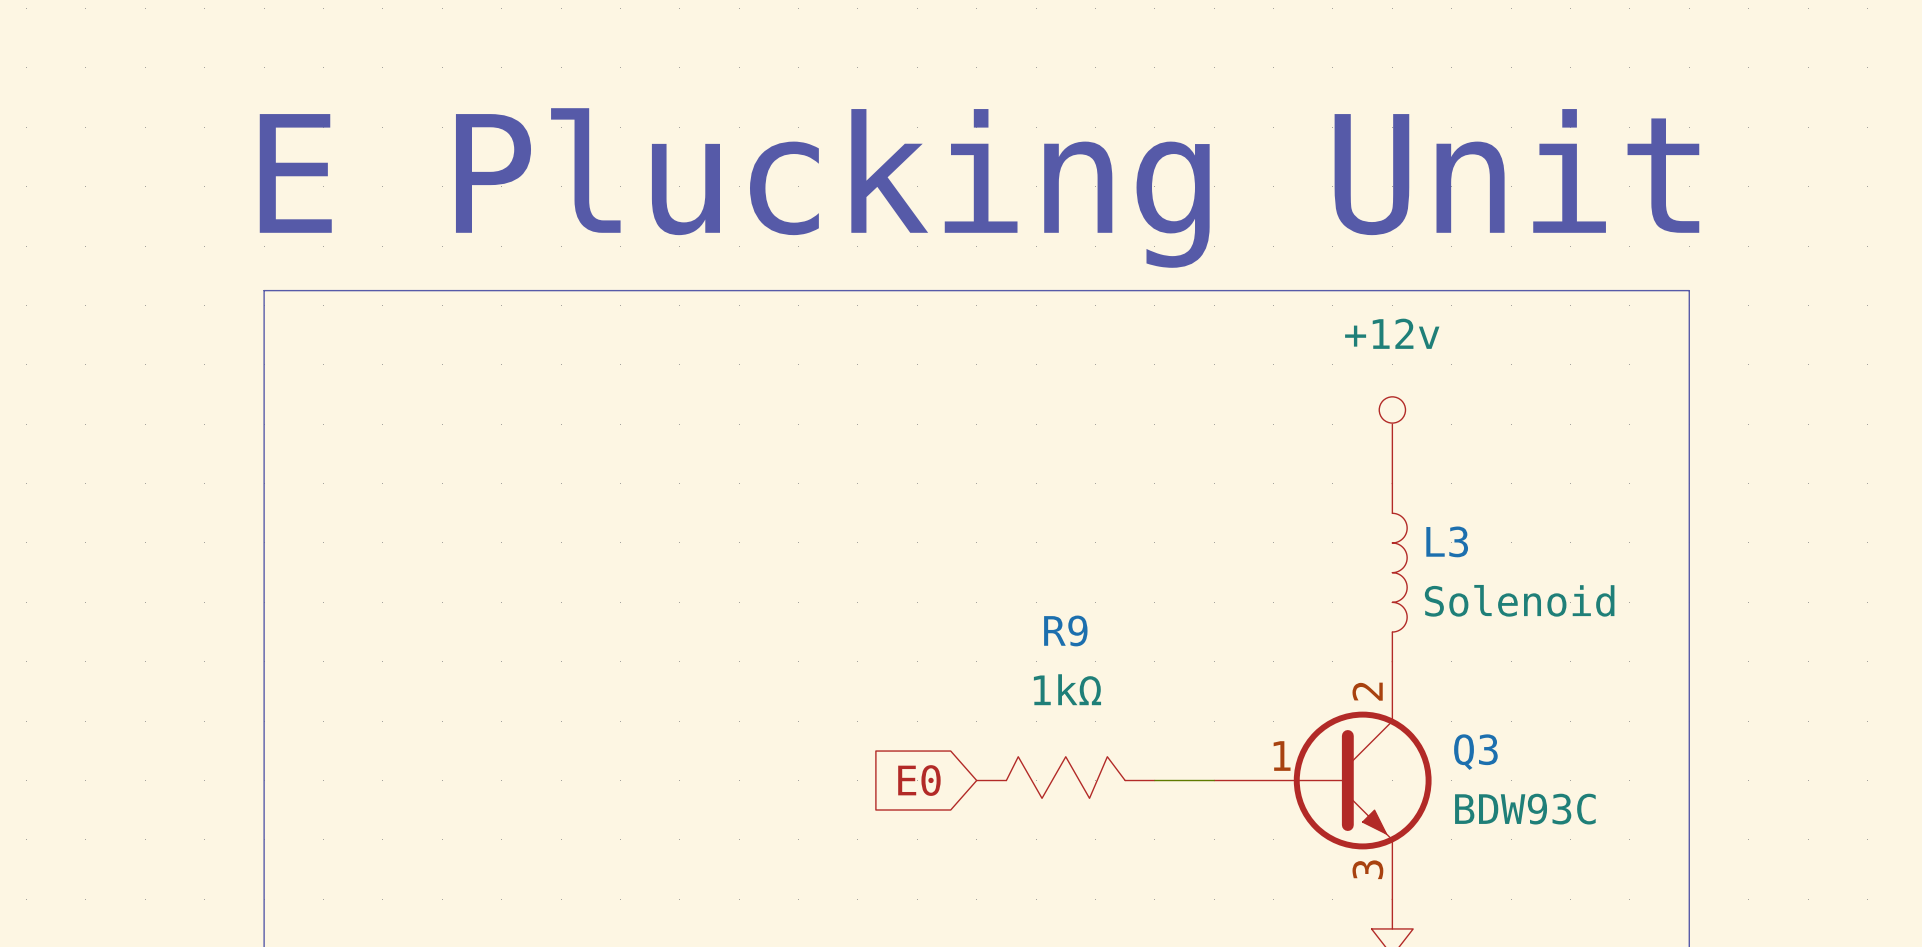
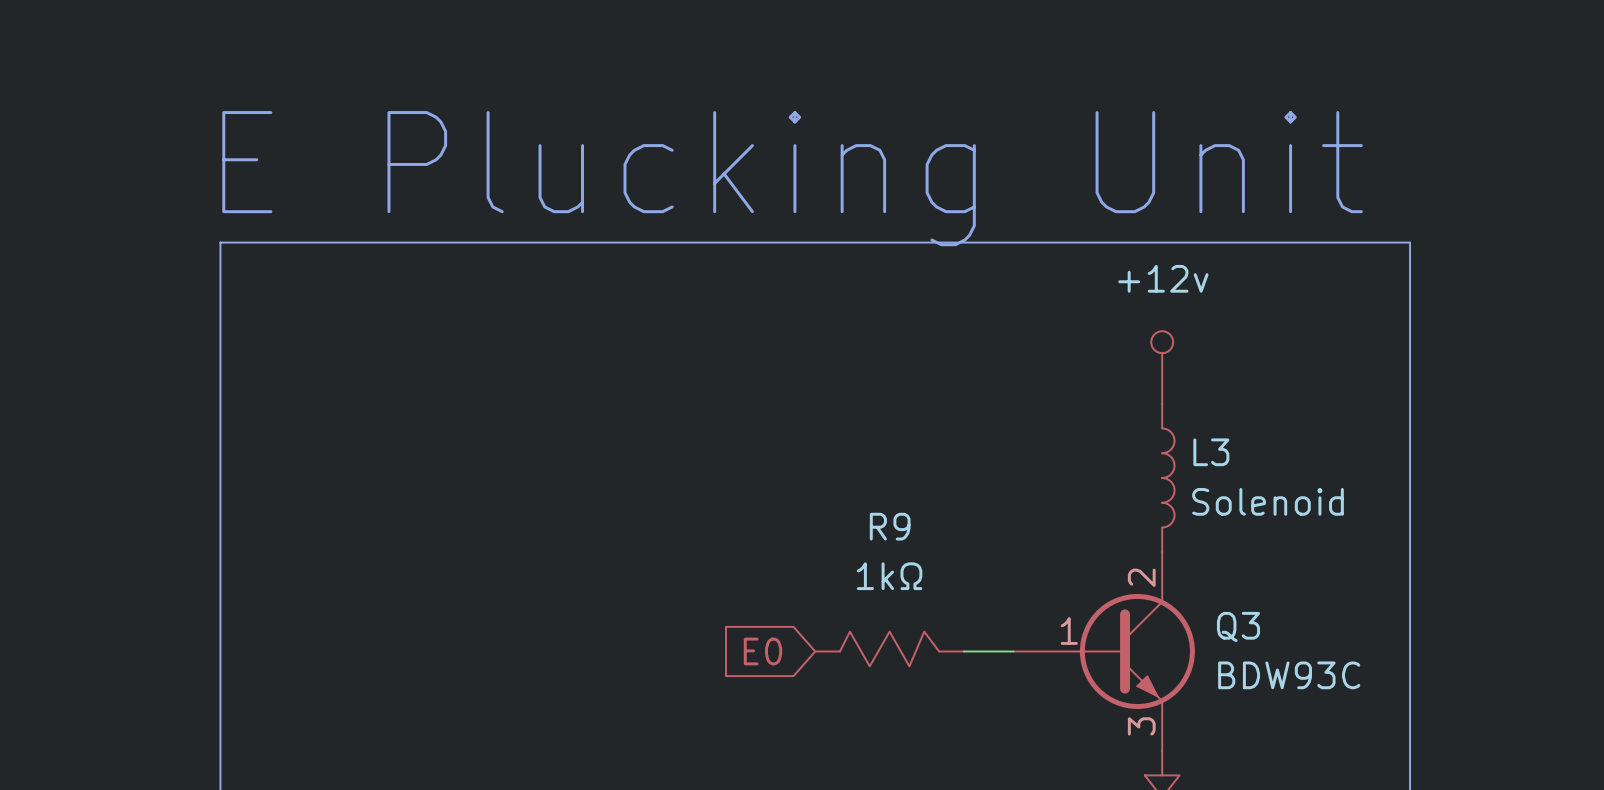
text position: E Plucking Unit (979, 187) -> E Plucking Unit (792, 178)

